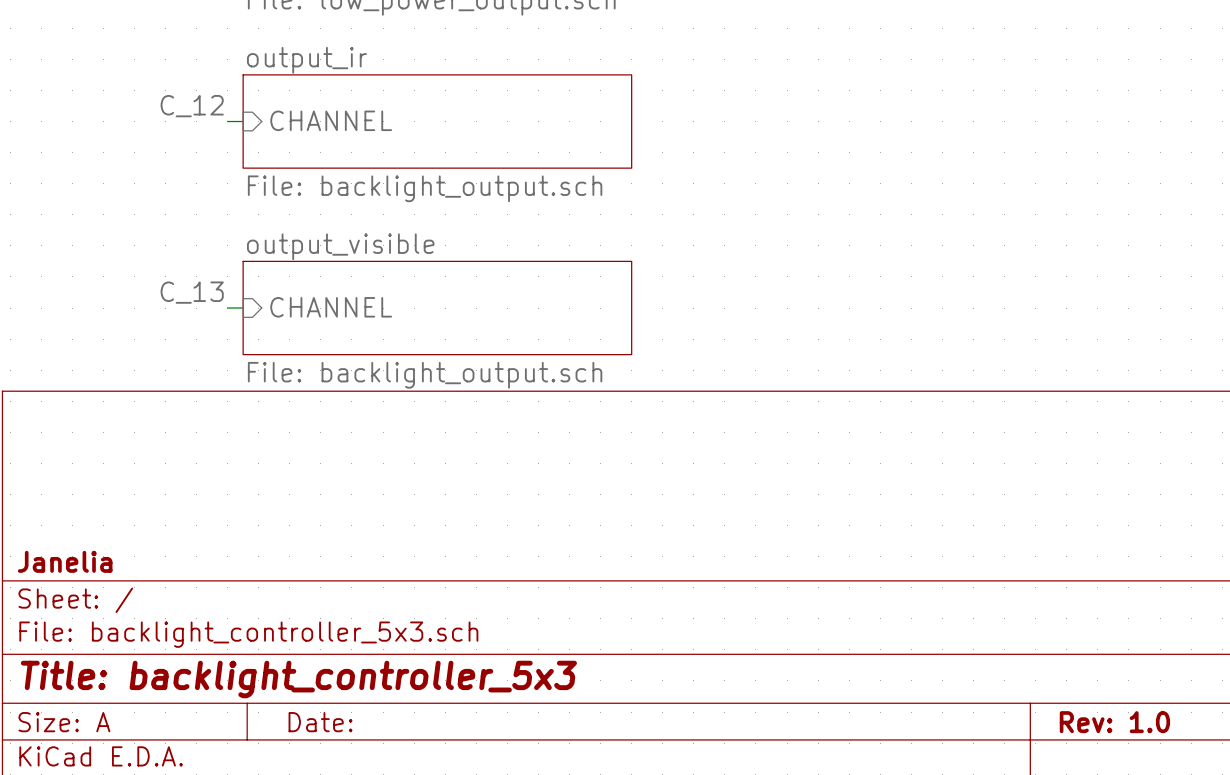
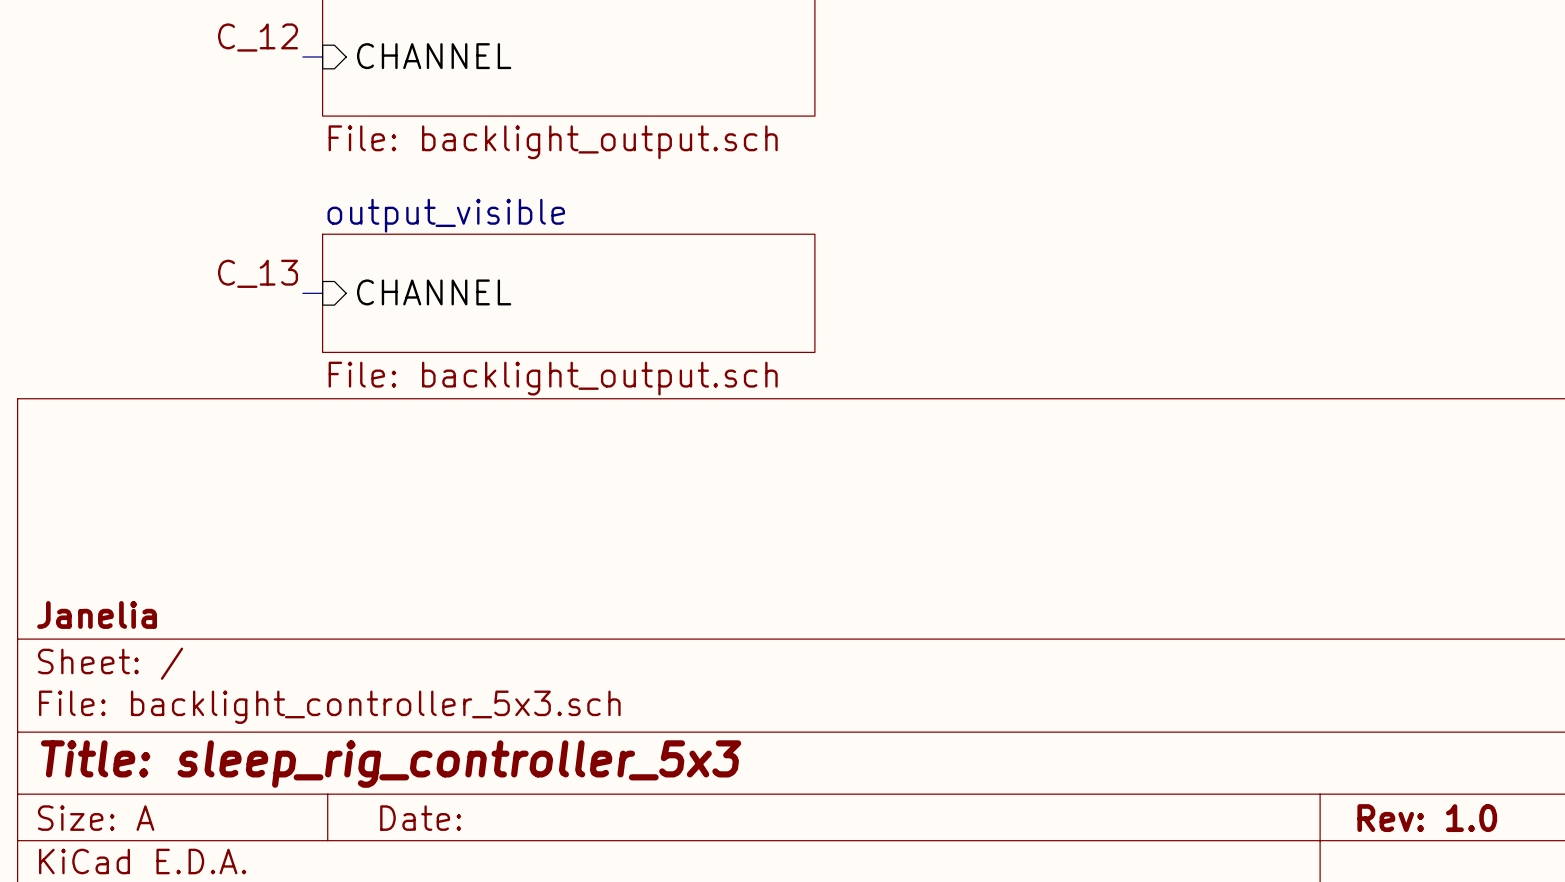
title block: Title: backlight_controller_5x3 (298, 679) -> Title: sleep_rig_controller_5x3 (391, 764)

